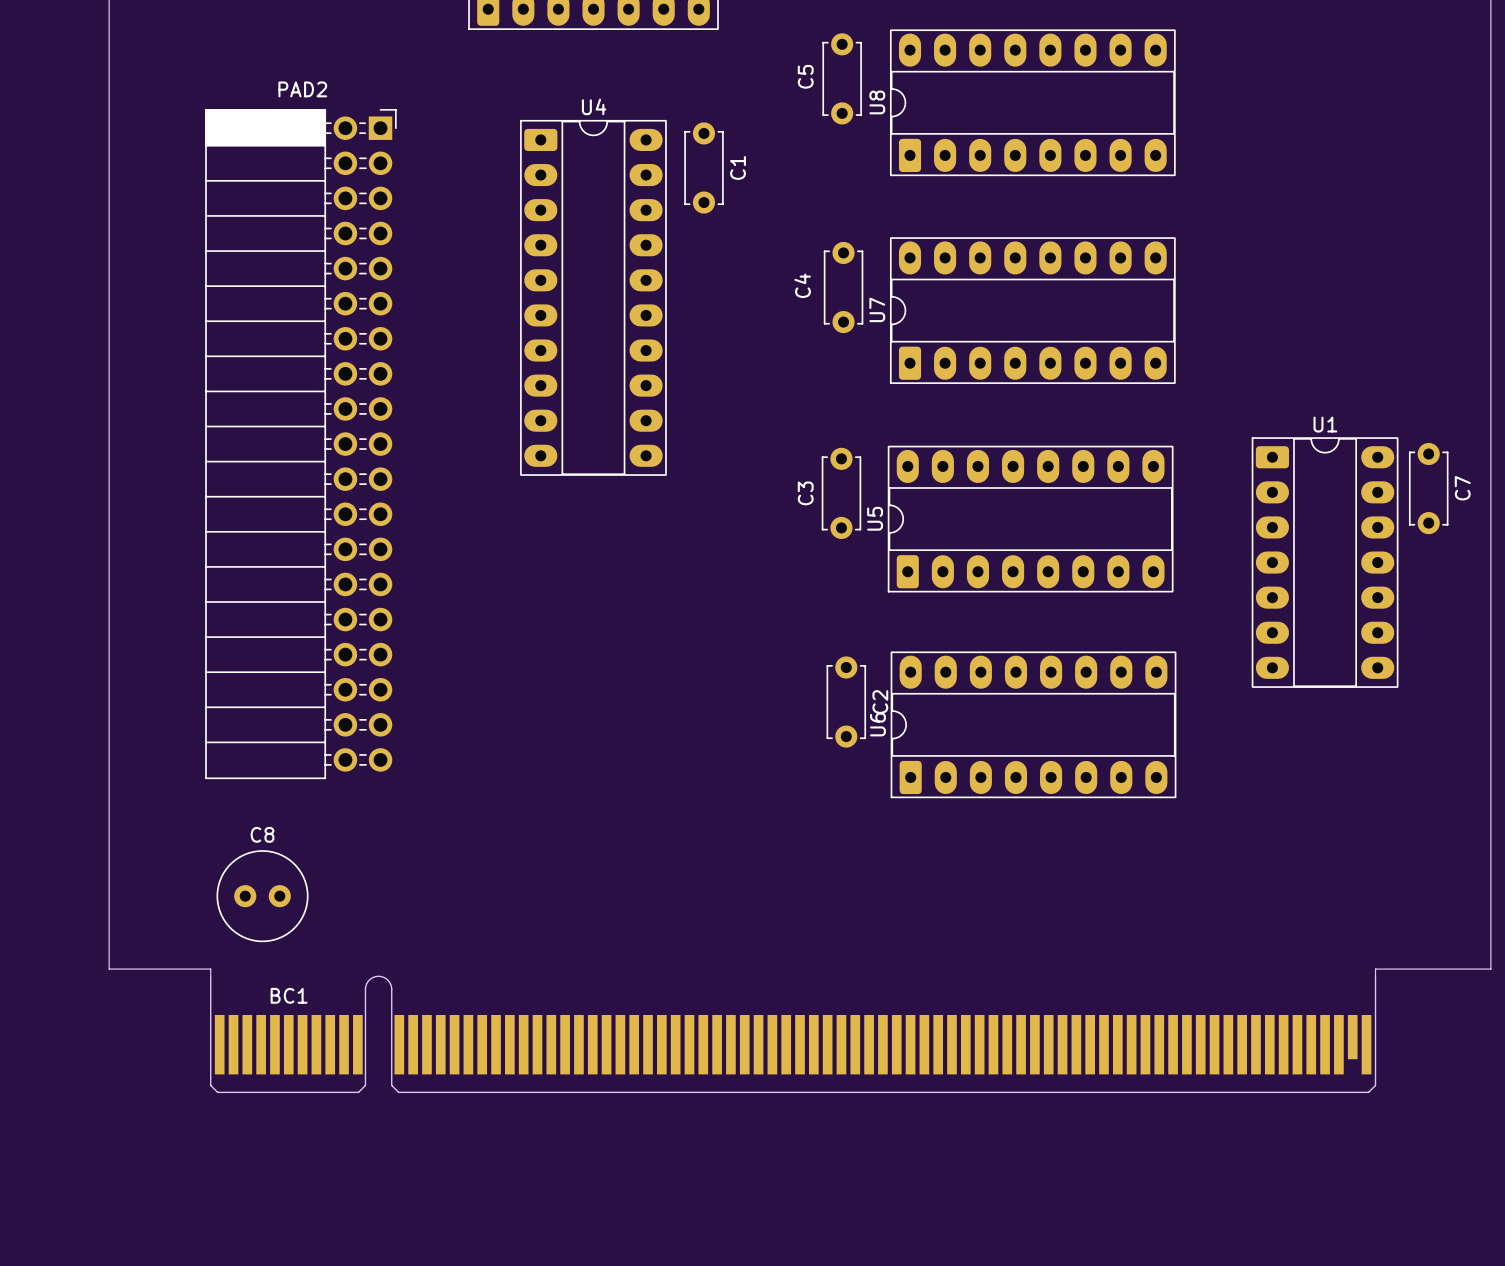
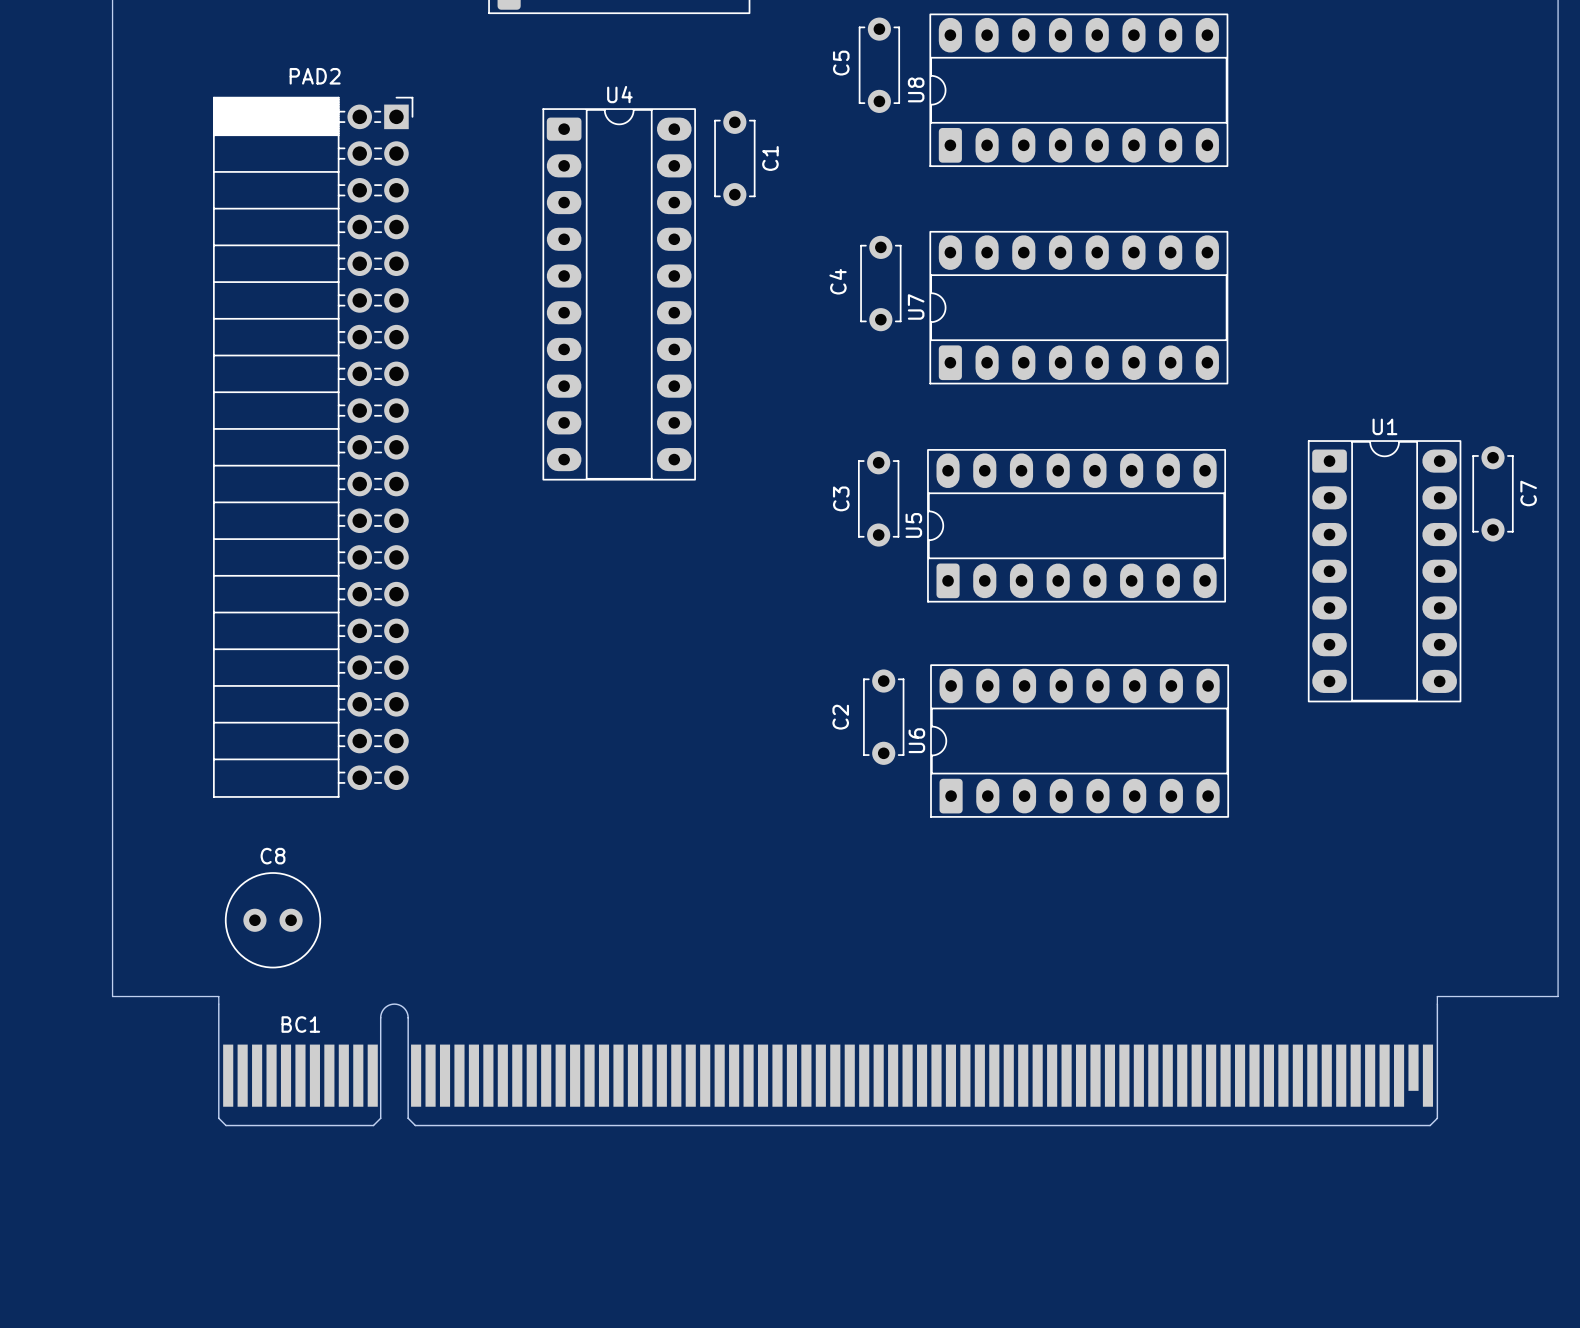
C2 name position: C2 (880, 702) -> C2 (840, 717)

